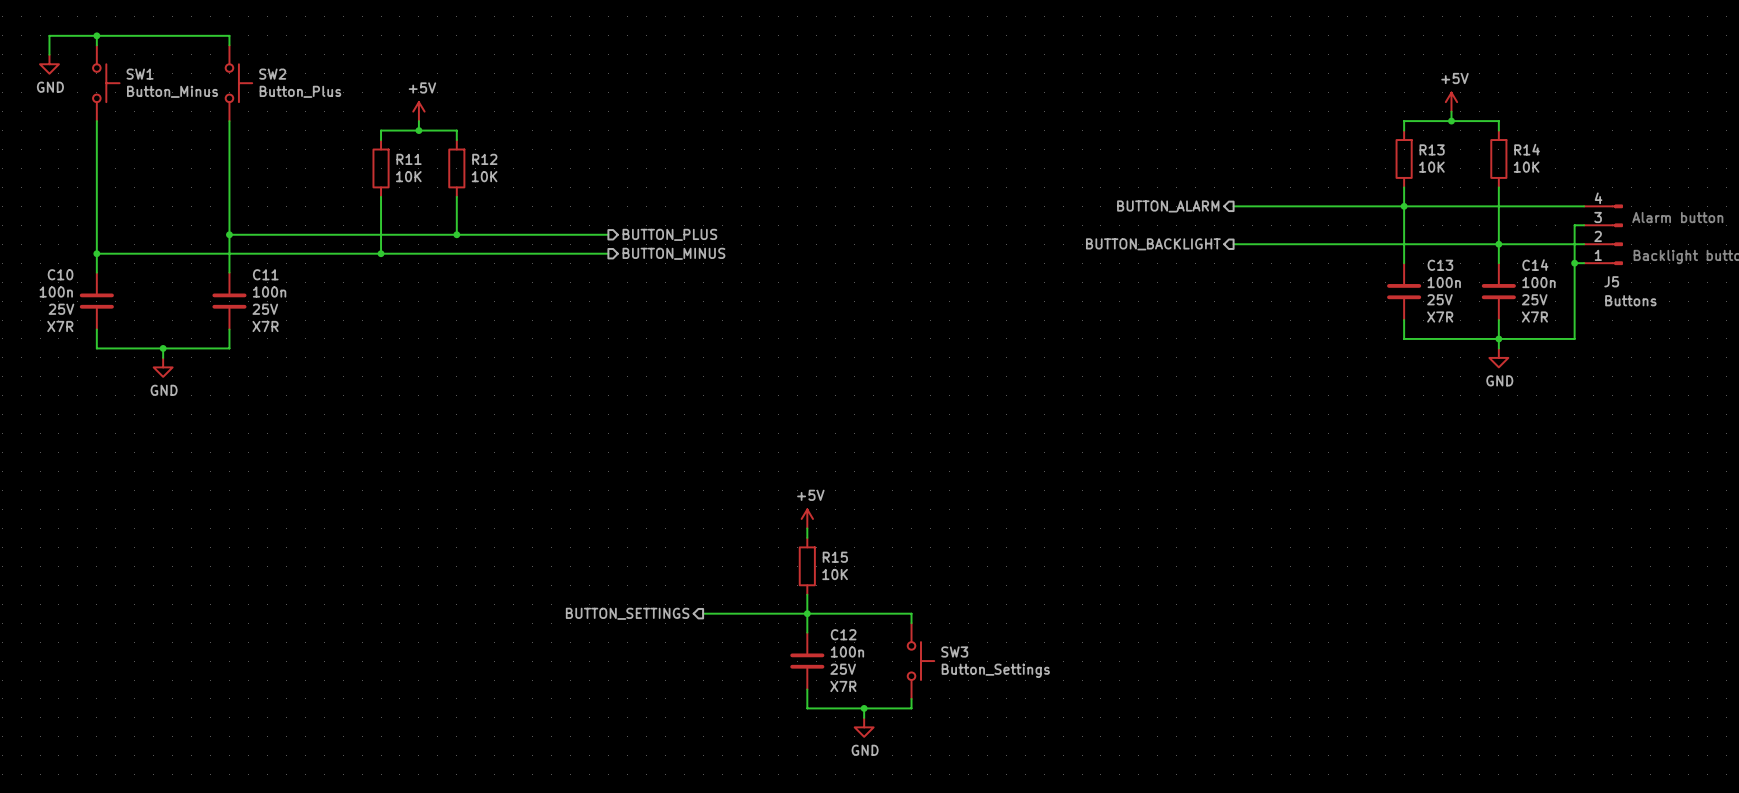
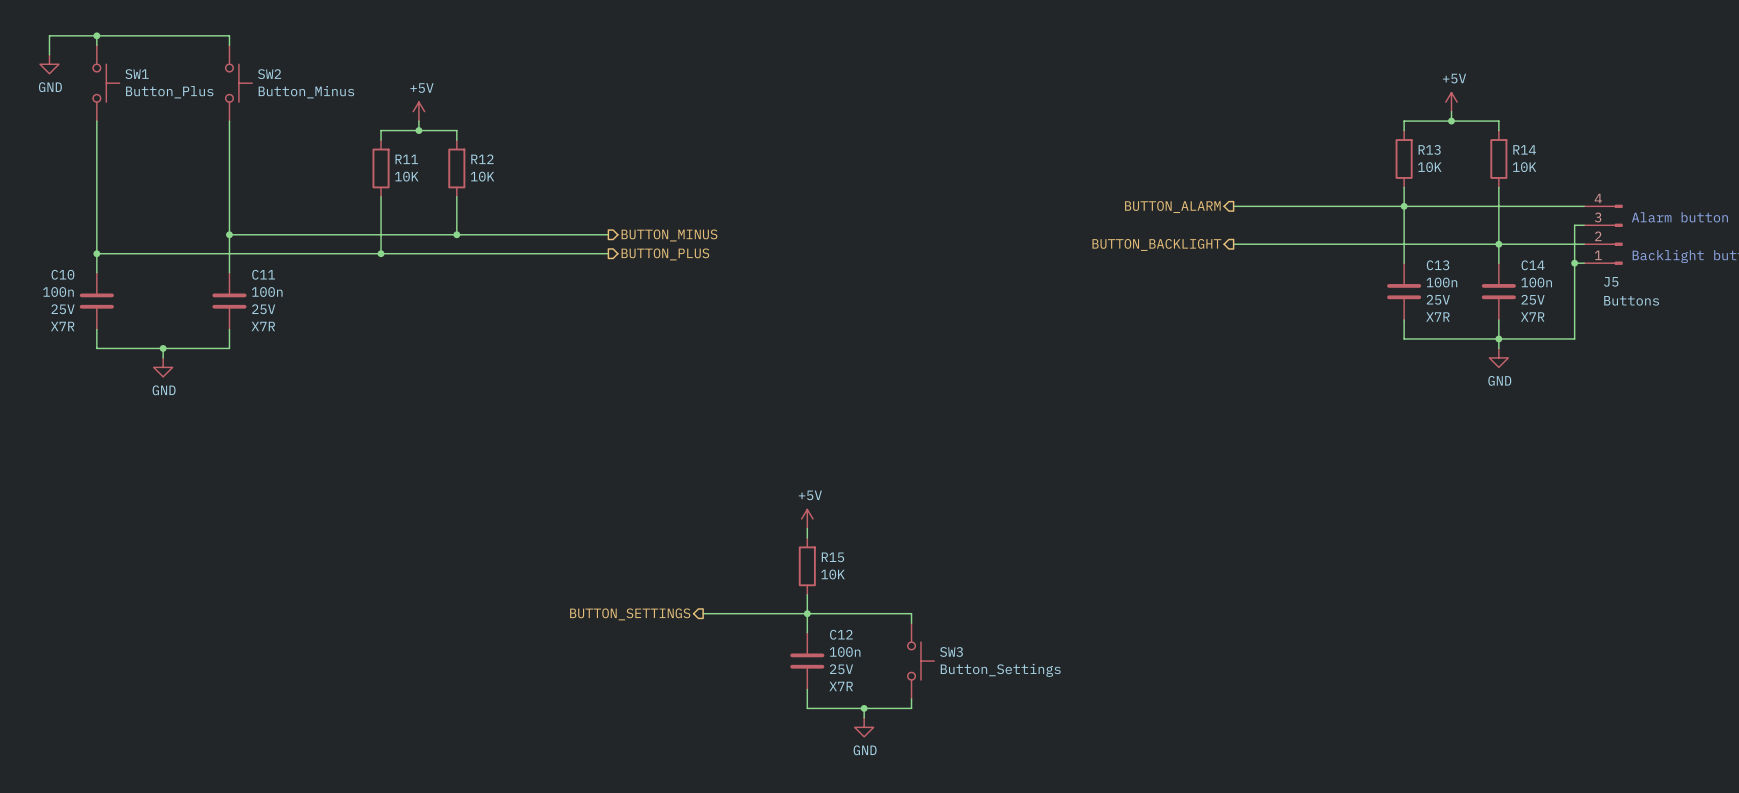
SW1 value: Button_Minus (172, 91) -> Button_Plus (169, 92)
SW2 value: Button_Plus (300, 91) -> Button_Minus (306, 92)
hierarchical label: BUTTON_PLUS (669, 234) -> BUTTON_MINUS (669, 235)
hierarchical label: BUTTON_MINUS (673, 253) -> BUTTON_PLUS (665, 254)

